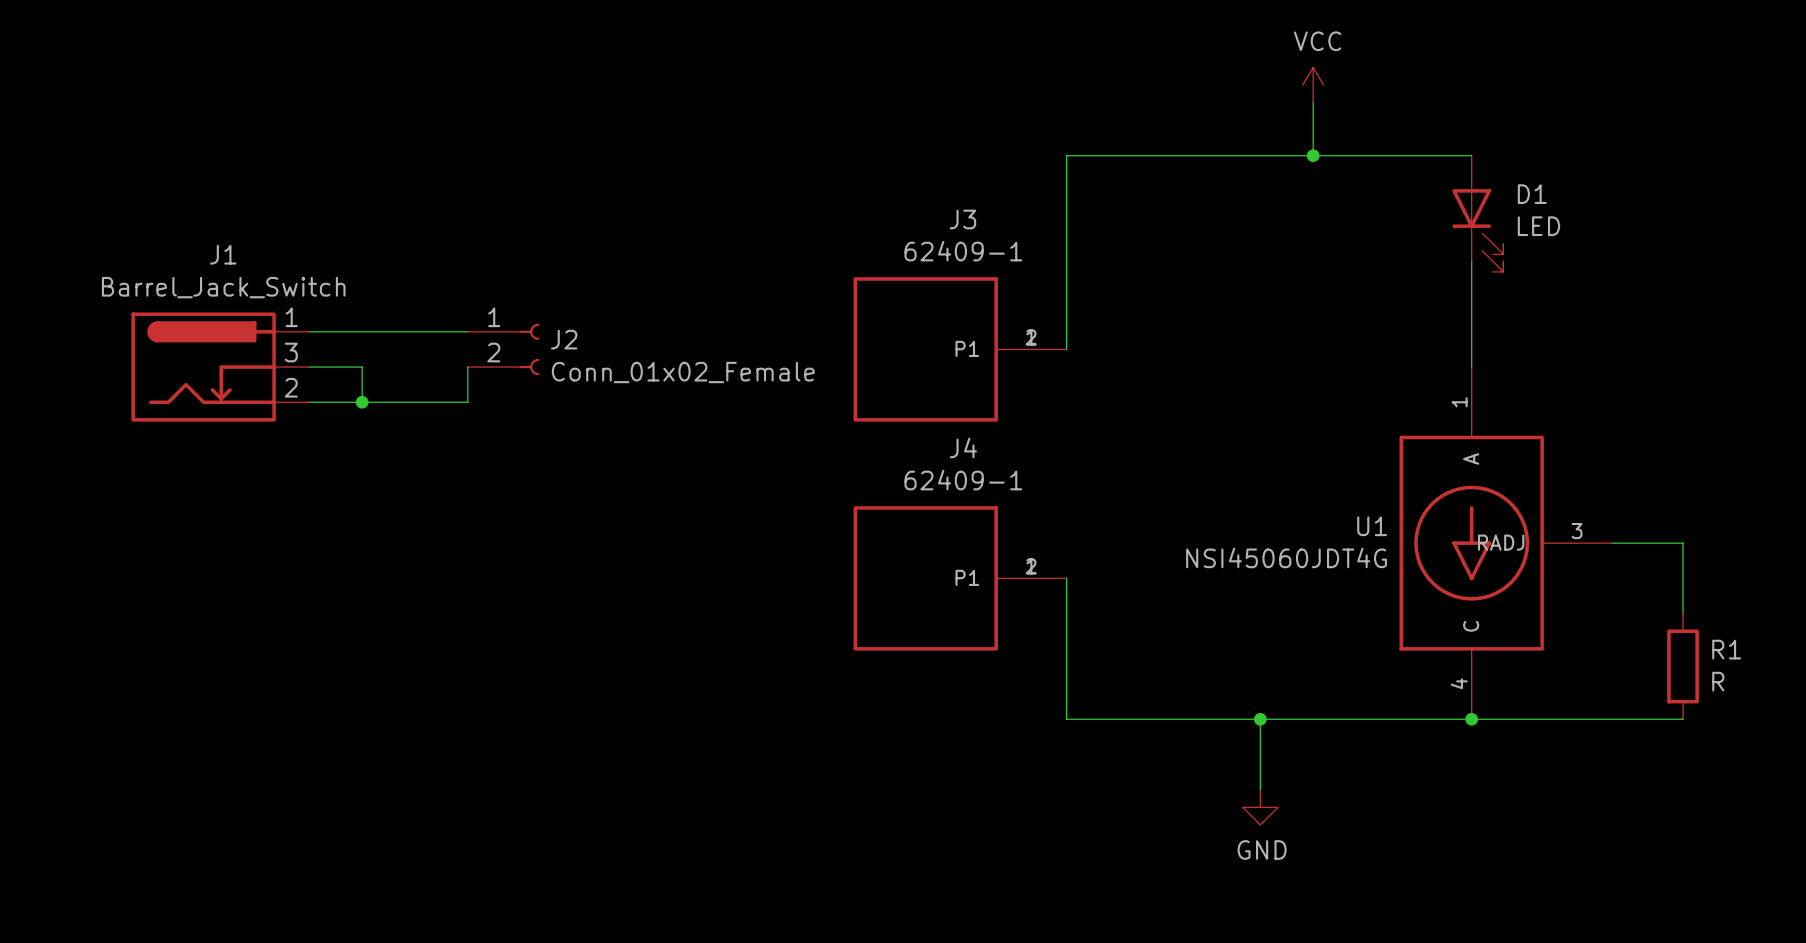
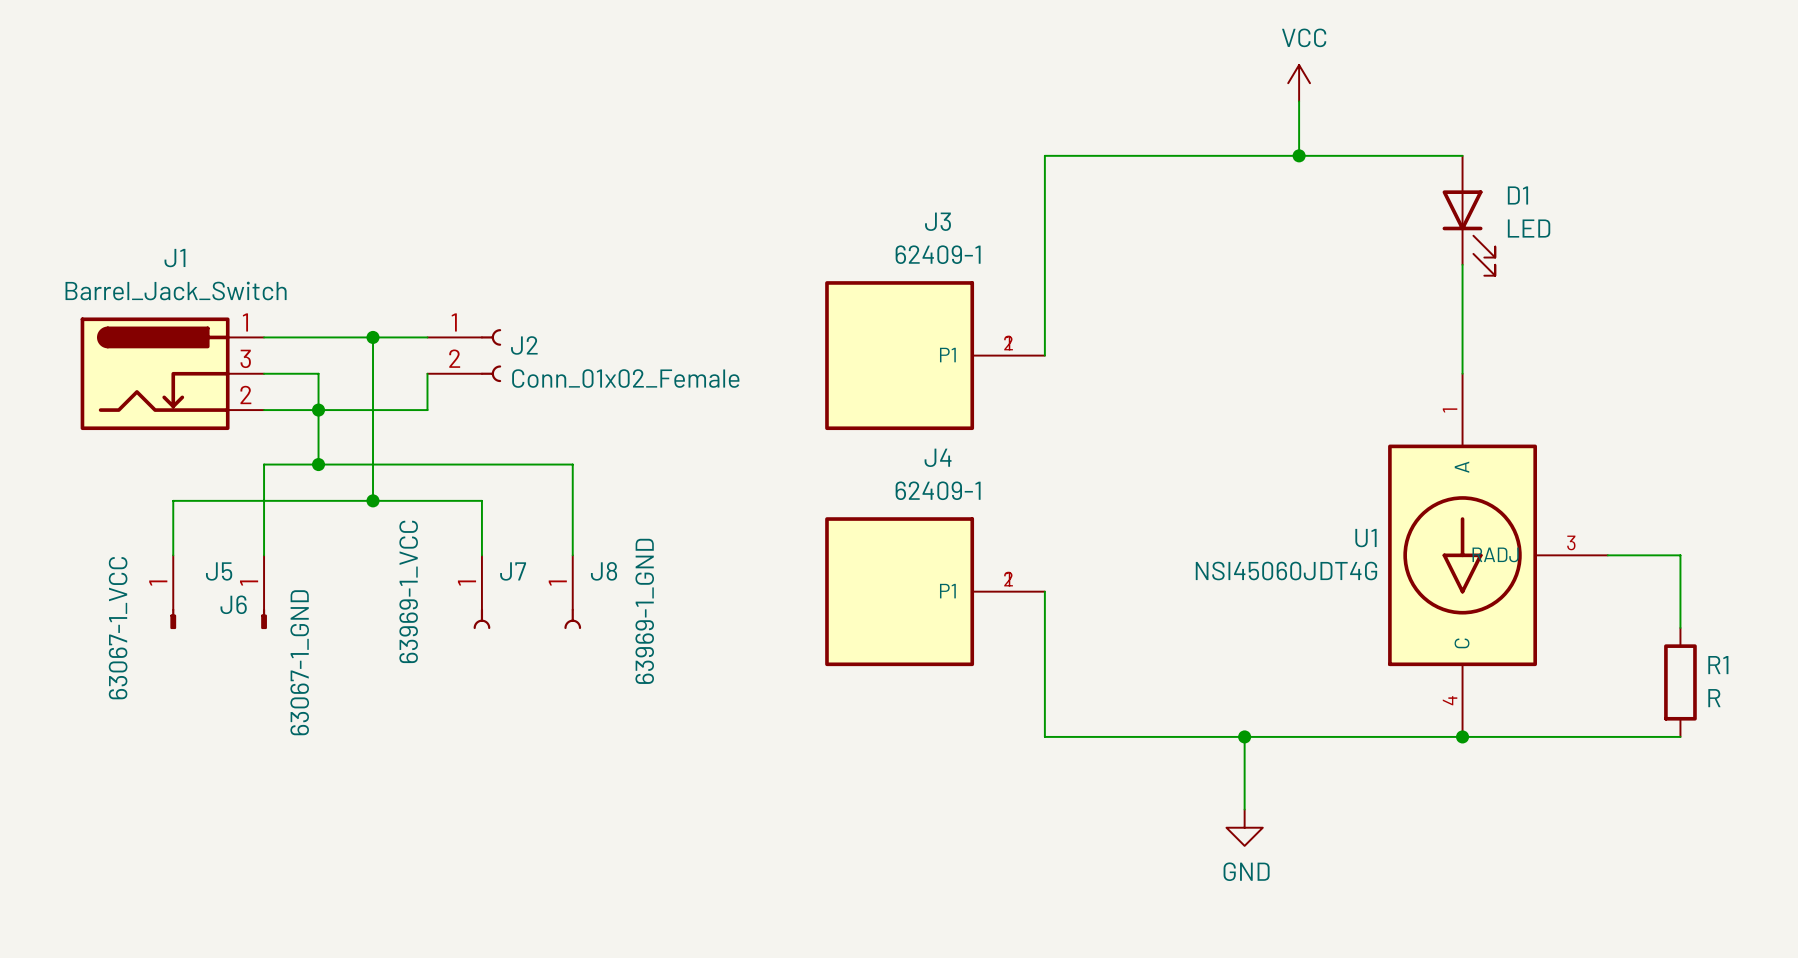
wire: none -> (373, 337) (373, 500)
junction: none -> (373, 337)
wire: none -> (318, 410) (318, 464)
junction: none -> (318, 464)
junction: none -> (373, 500)
wire: none -> (173, 555) (173, 500) (481, 500) (481, 555)
wire: none -> (264, 555) (264, 464) (572, 464) (572, 555)
J5: none -> 63067-1_VCC (173, 592)
J6: none -> 63067-1_GND (264, 592)
J7: none -> 63969-1_VCC (481, 592)
J8: none -> 63969-1_GND (572, 592)

